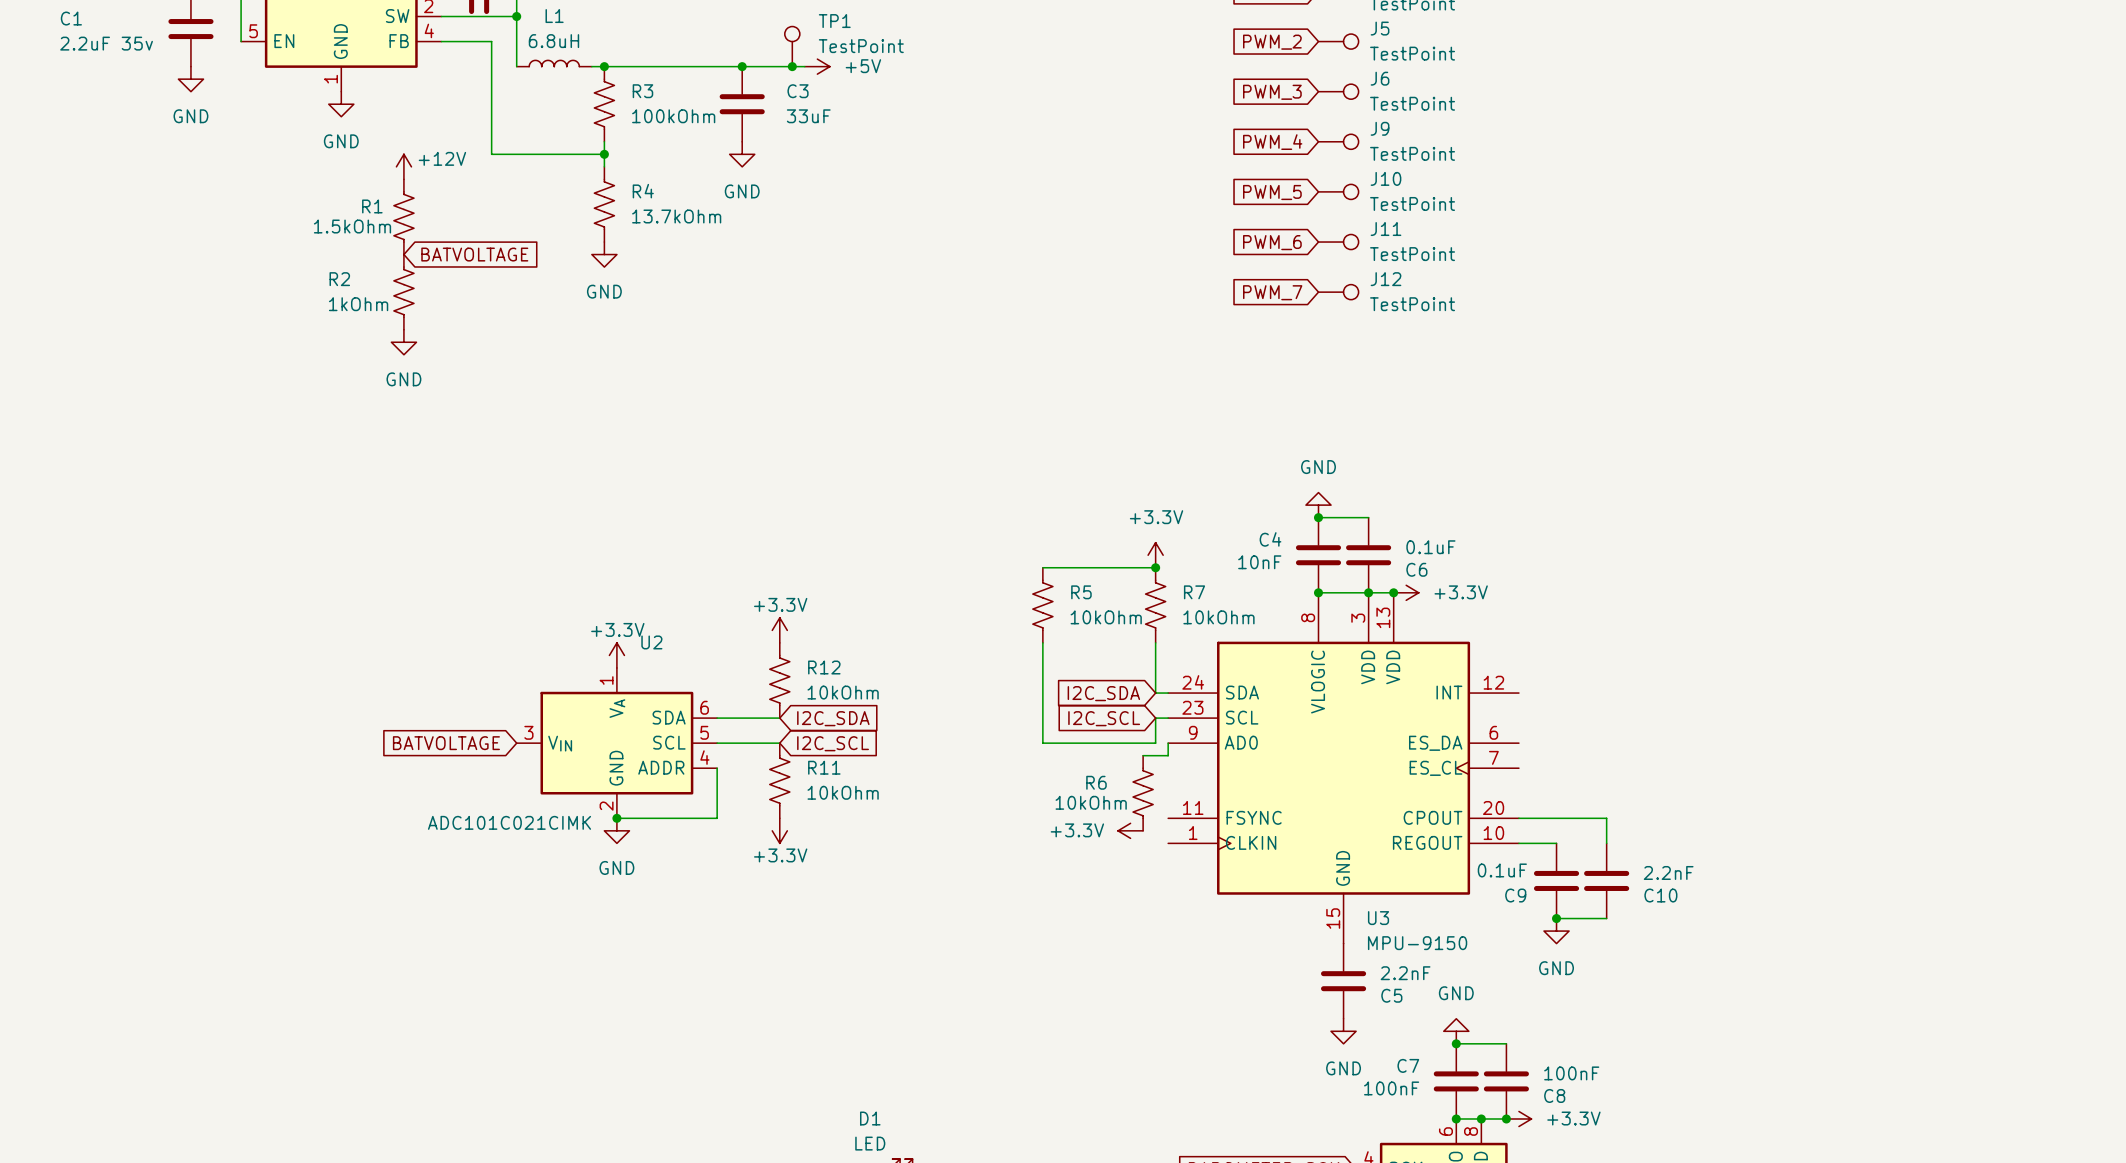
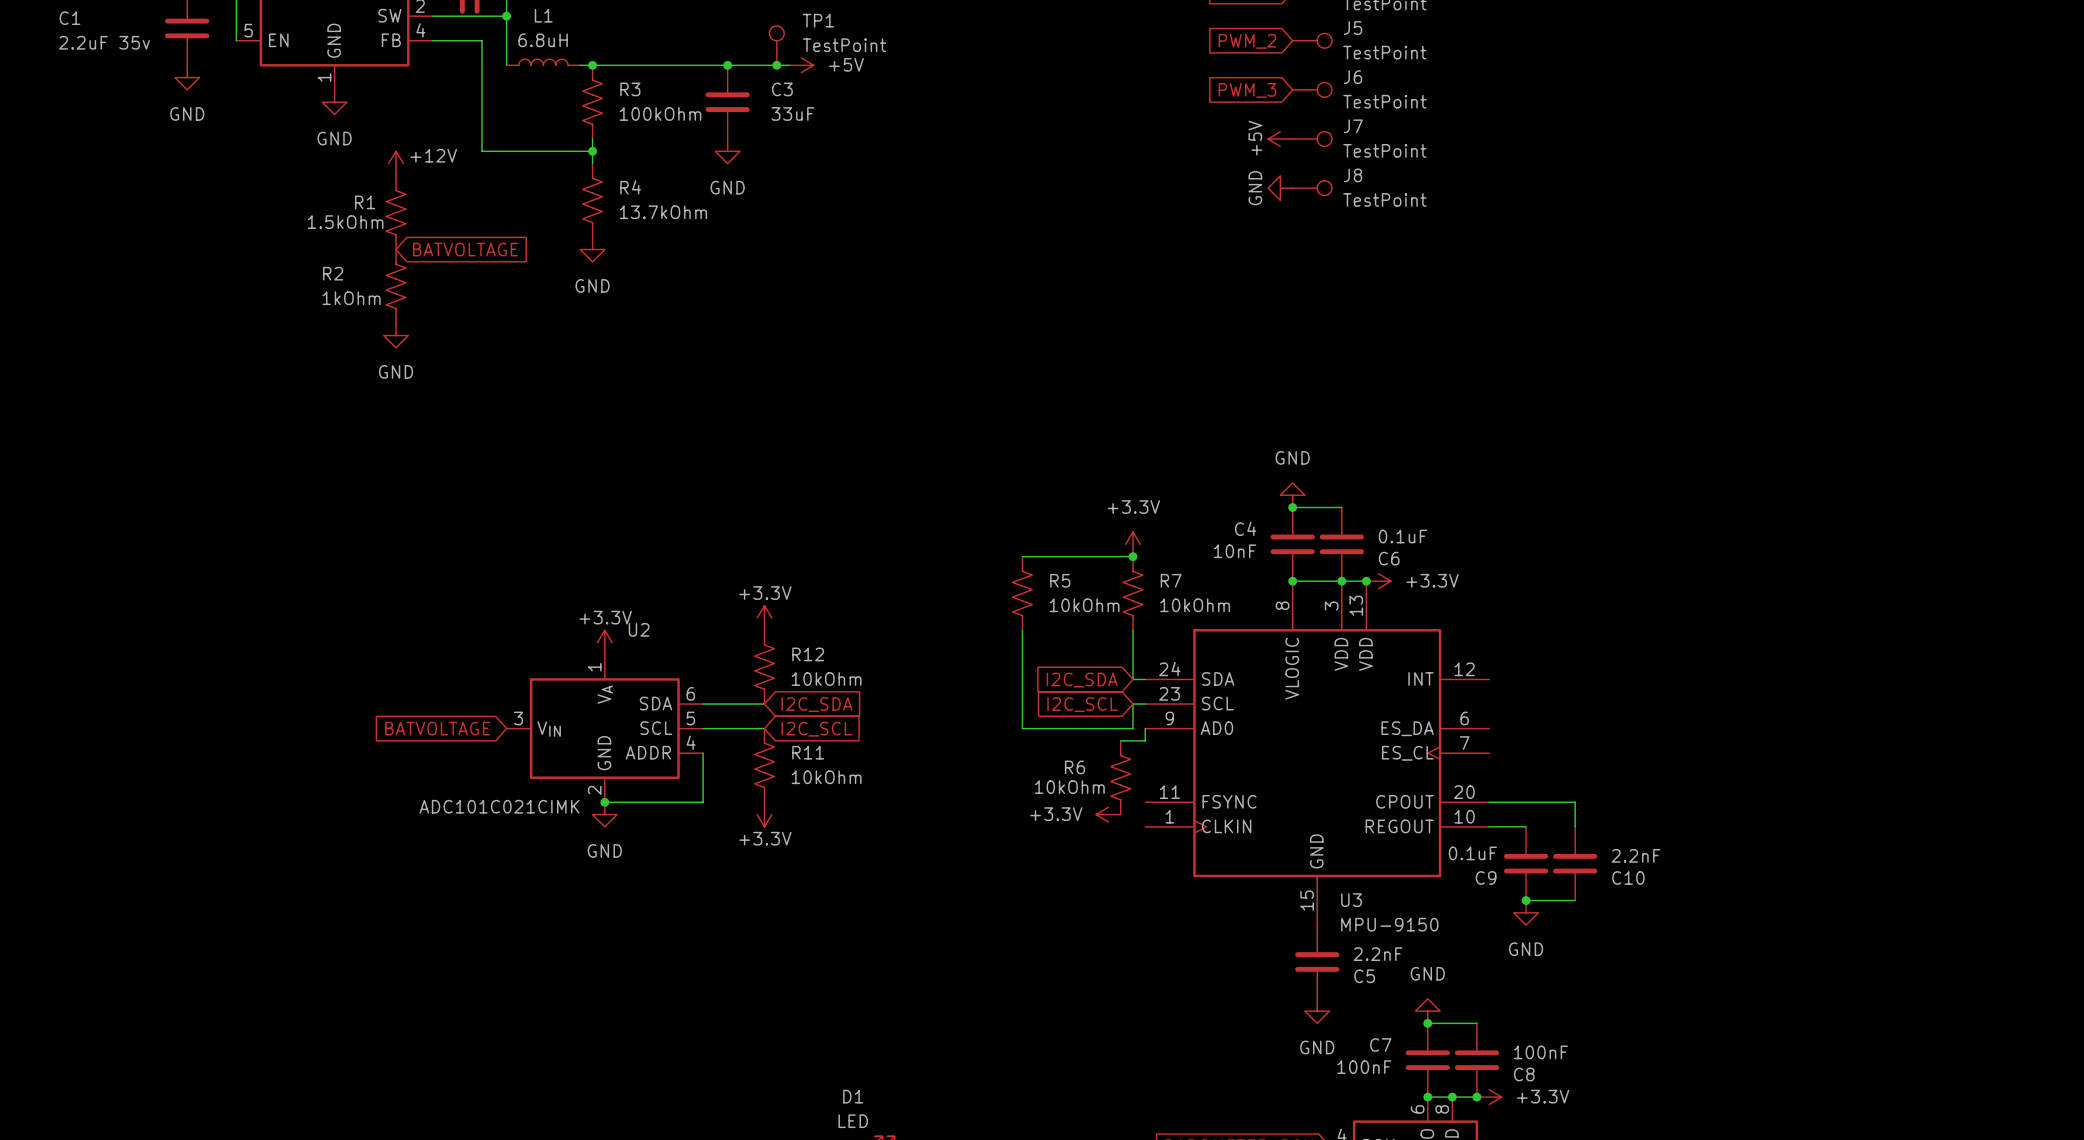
J9 name: J9 (1380, 128) -> J7 (1353, 126)
power symbol: none -> +5V (1280, 139)
global label: PWM_4 (1272, 142) -> none
J10 name: J10 (1386, 178) -> J8 (1353, 175)
power symbol: none -> GND (1280, 188)
global label: PWM_5 (1272, 192) -> none
global label: PWM_6 (1272, 242) -> none
J11: TestPoint (1338, 242) -> none
global label: PWM_7 (1272, 292) -> none
J12: TestPoint (1338, 292) -> none

